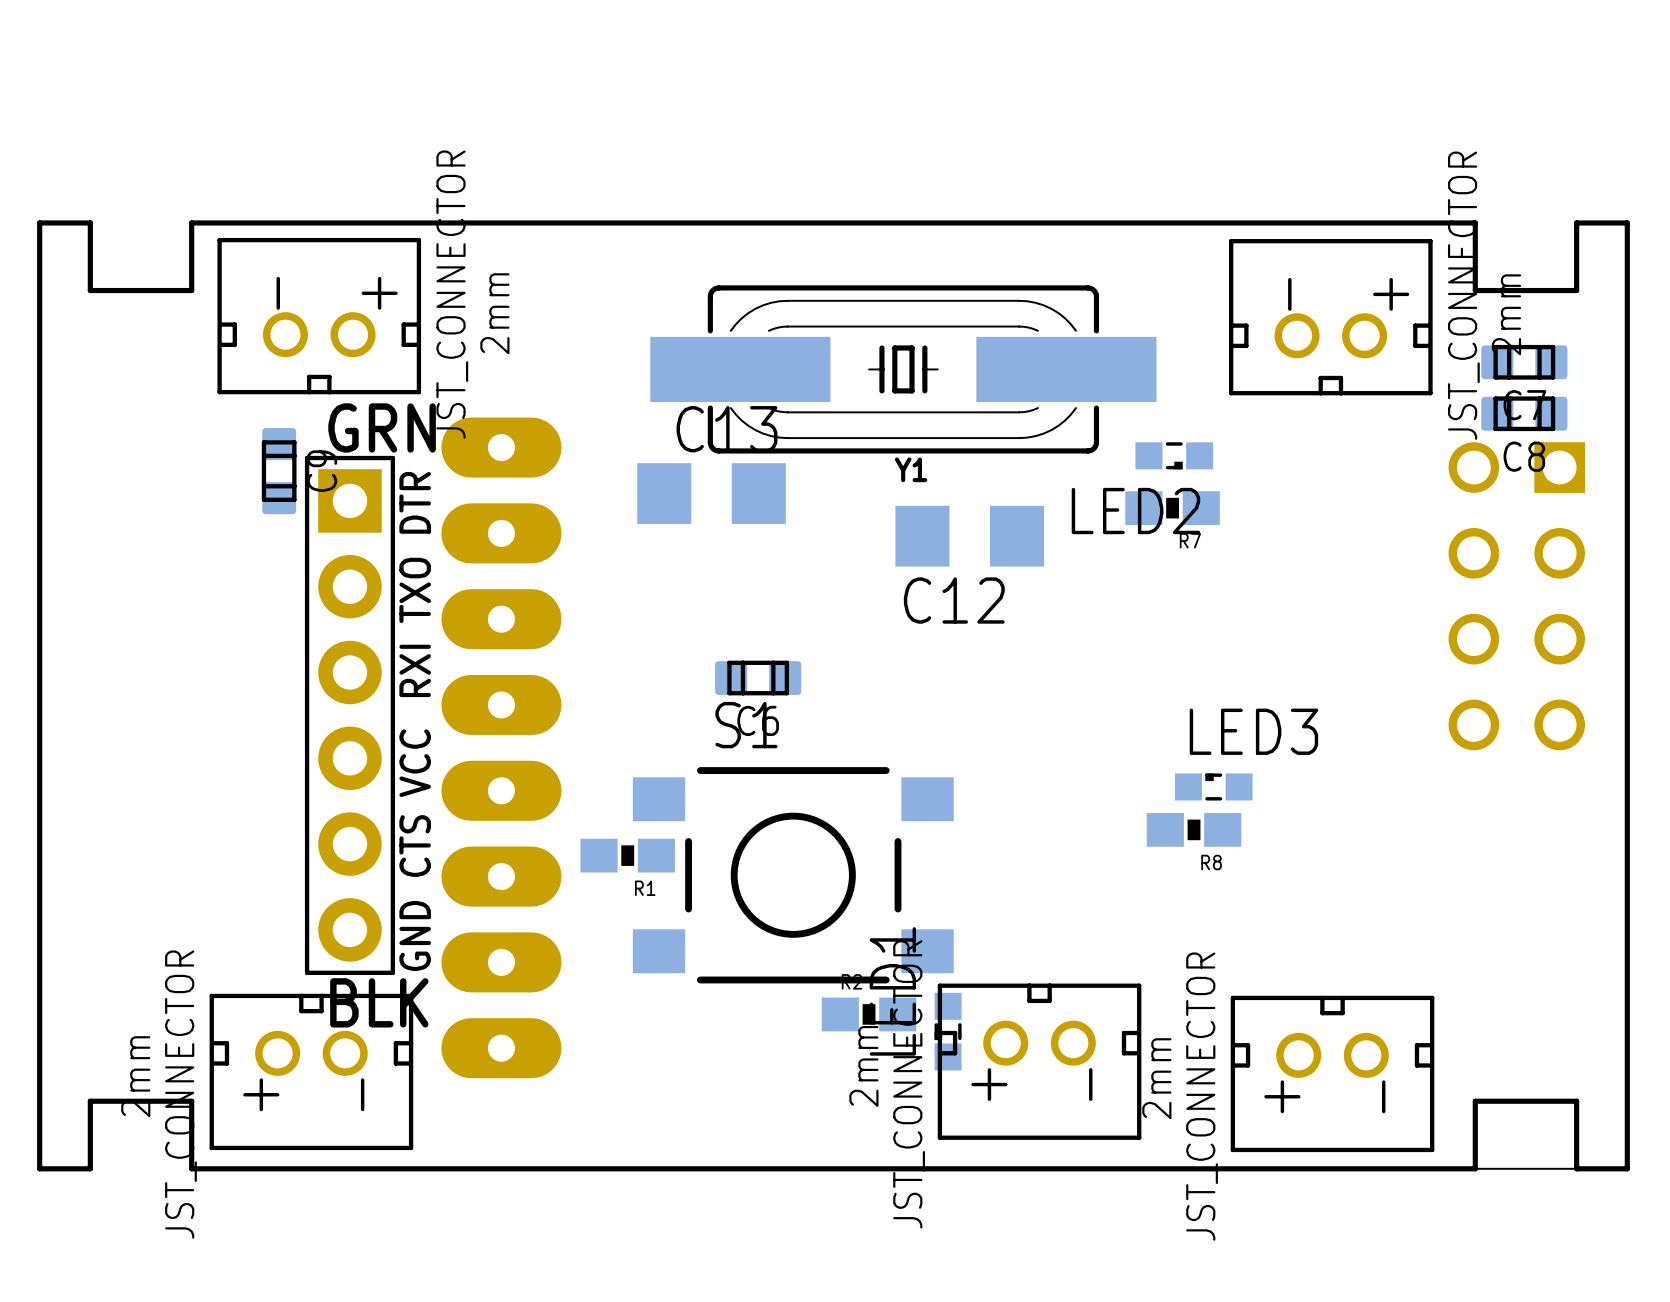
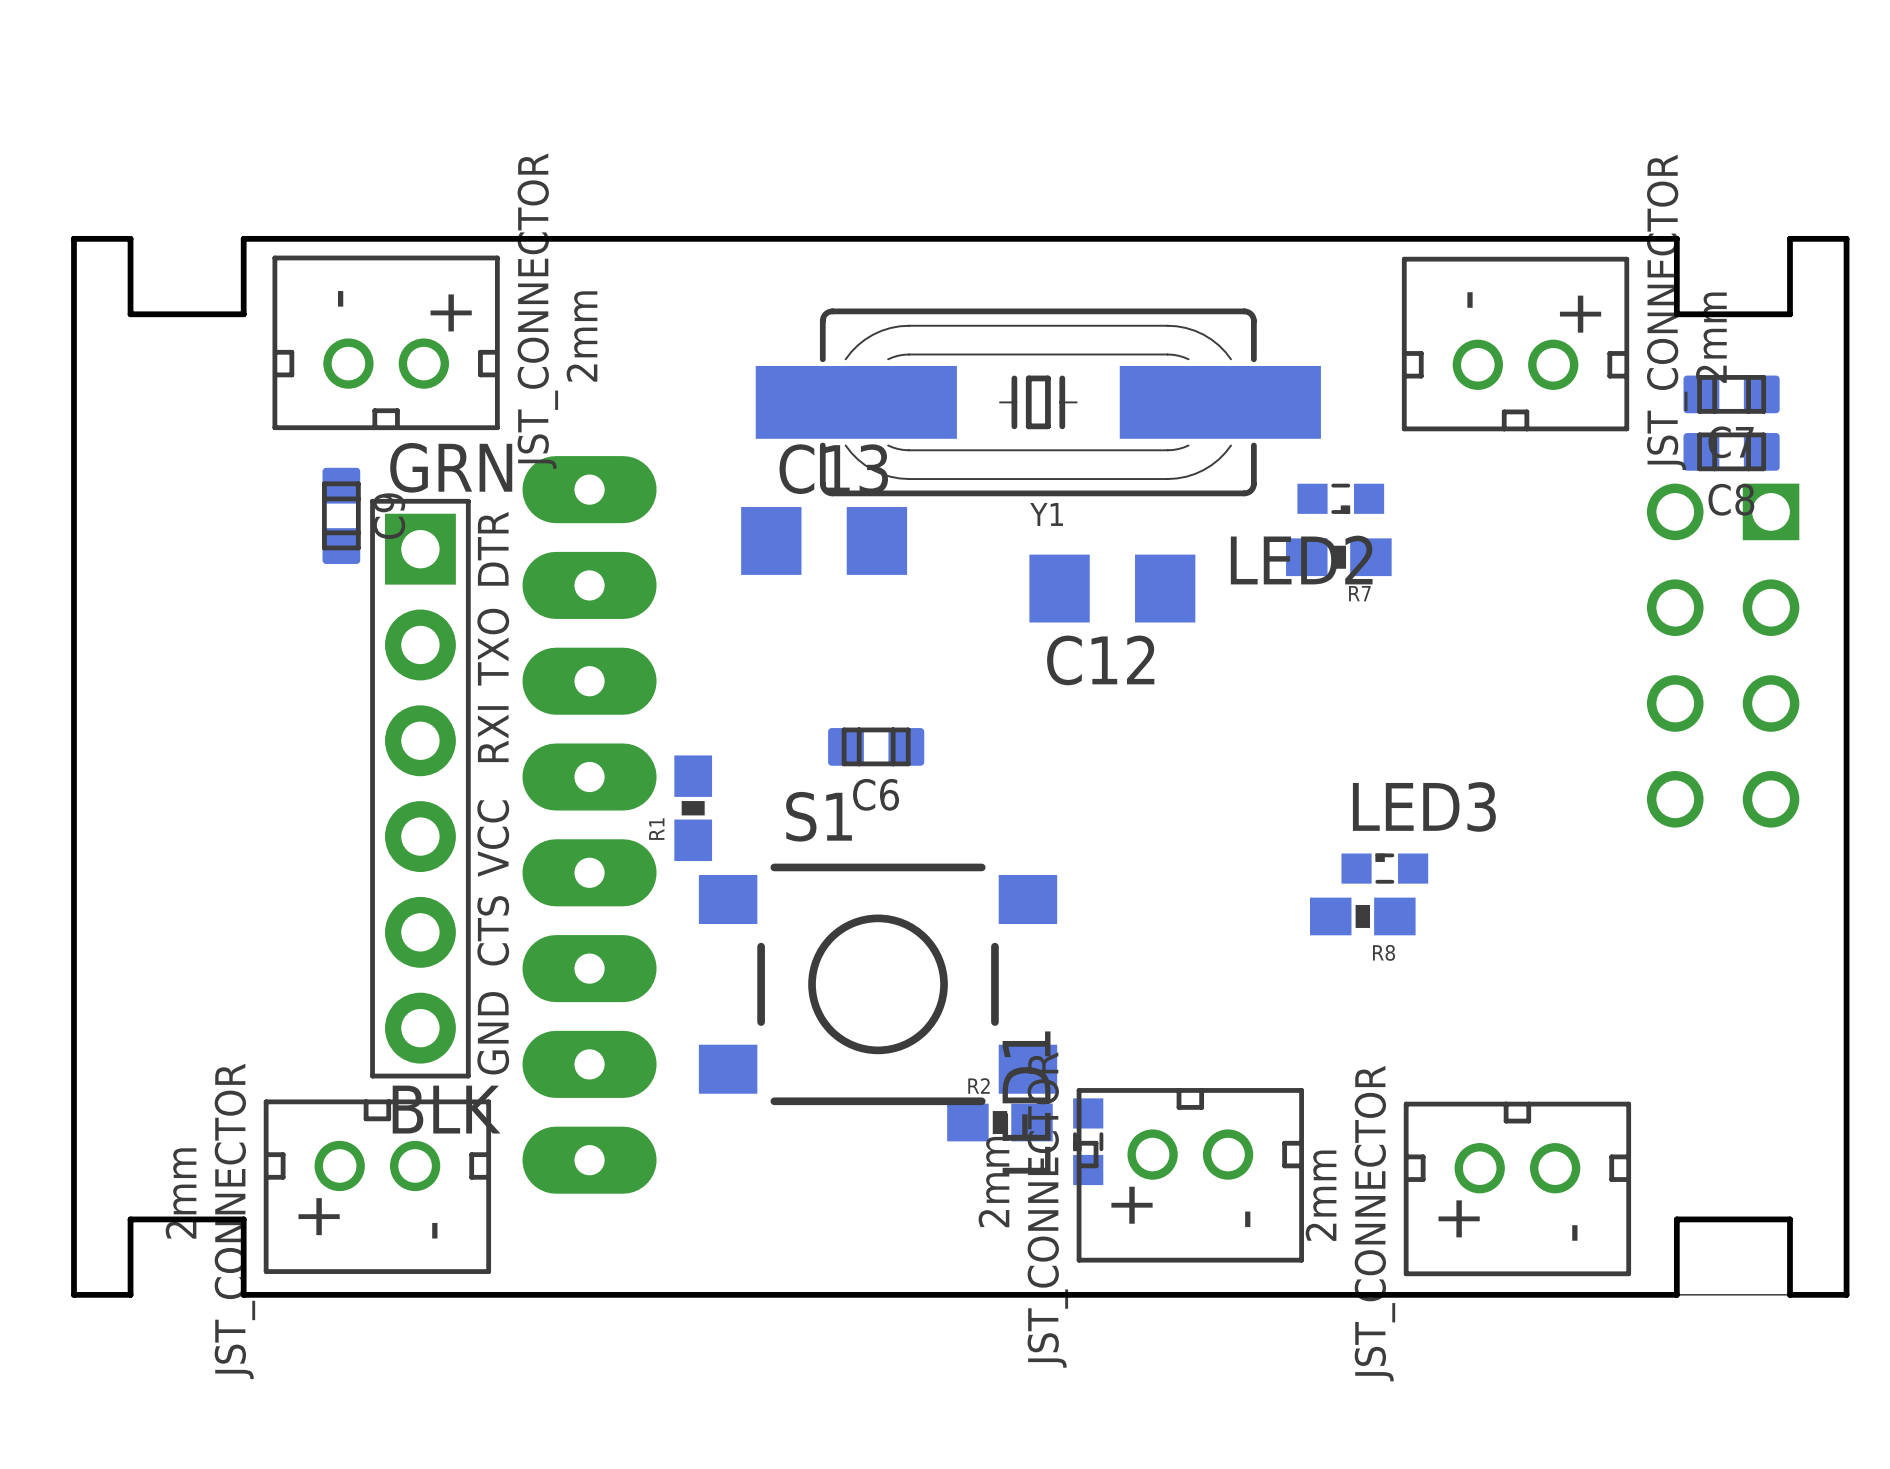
R1 rotation: 0° (627, 855) -> 90° clockwise (693, 808)
R1 position: (627, 855) -> (693, 808)
S1 position: (793, 875) -> (878, 984)

